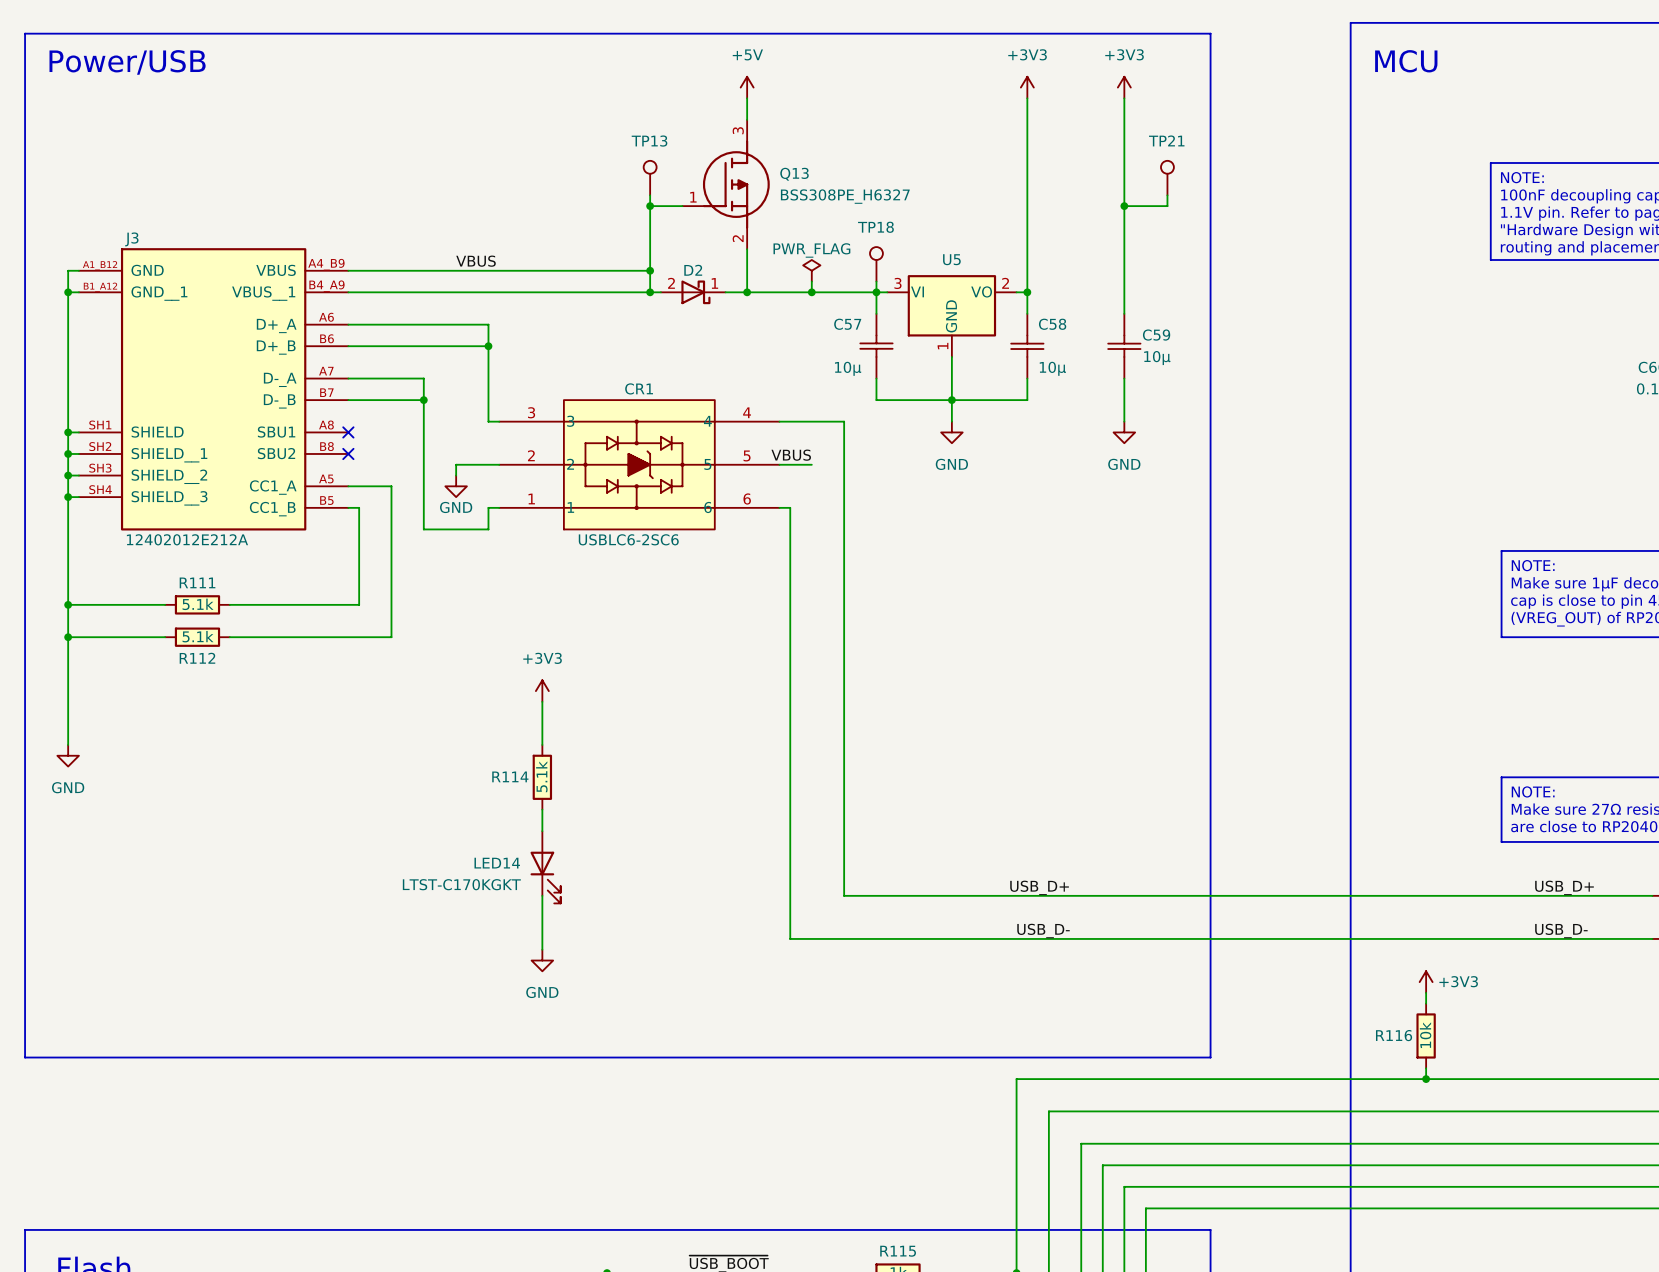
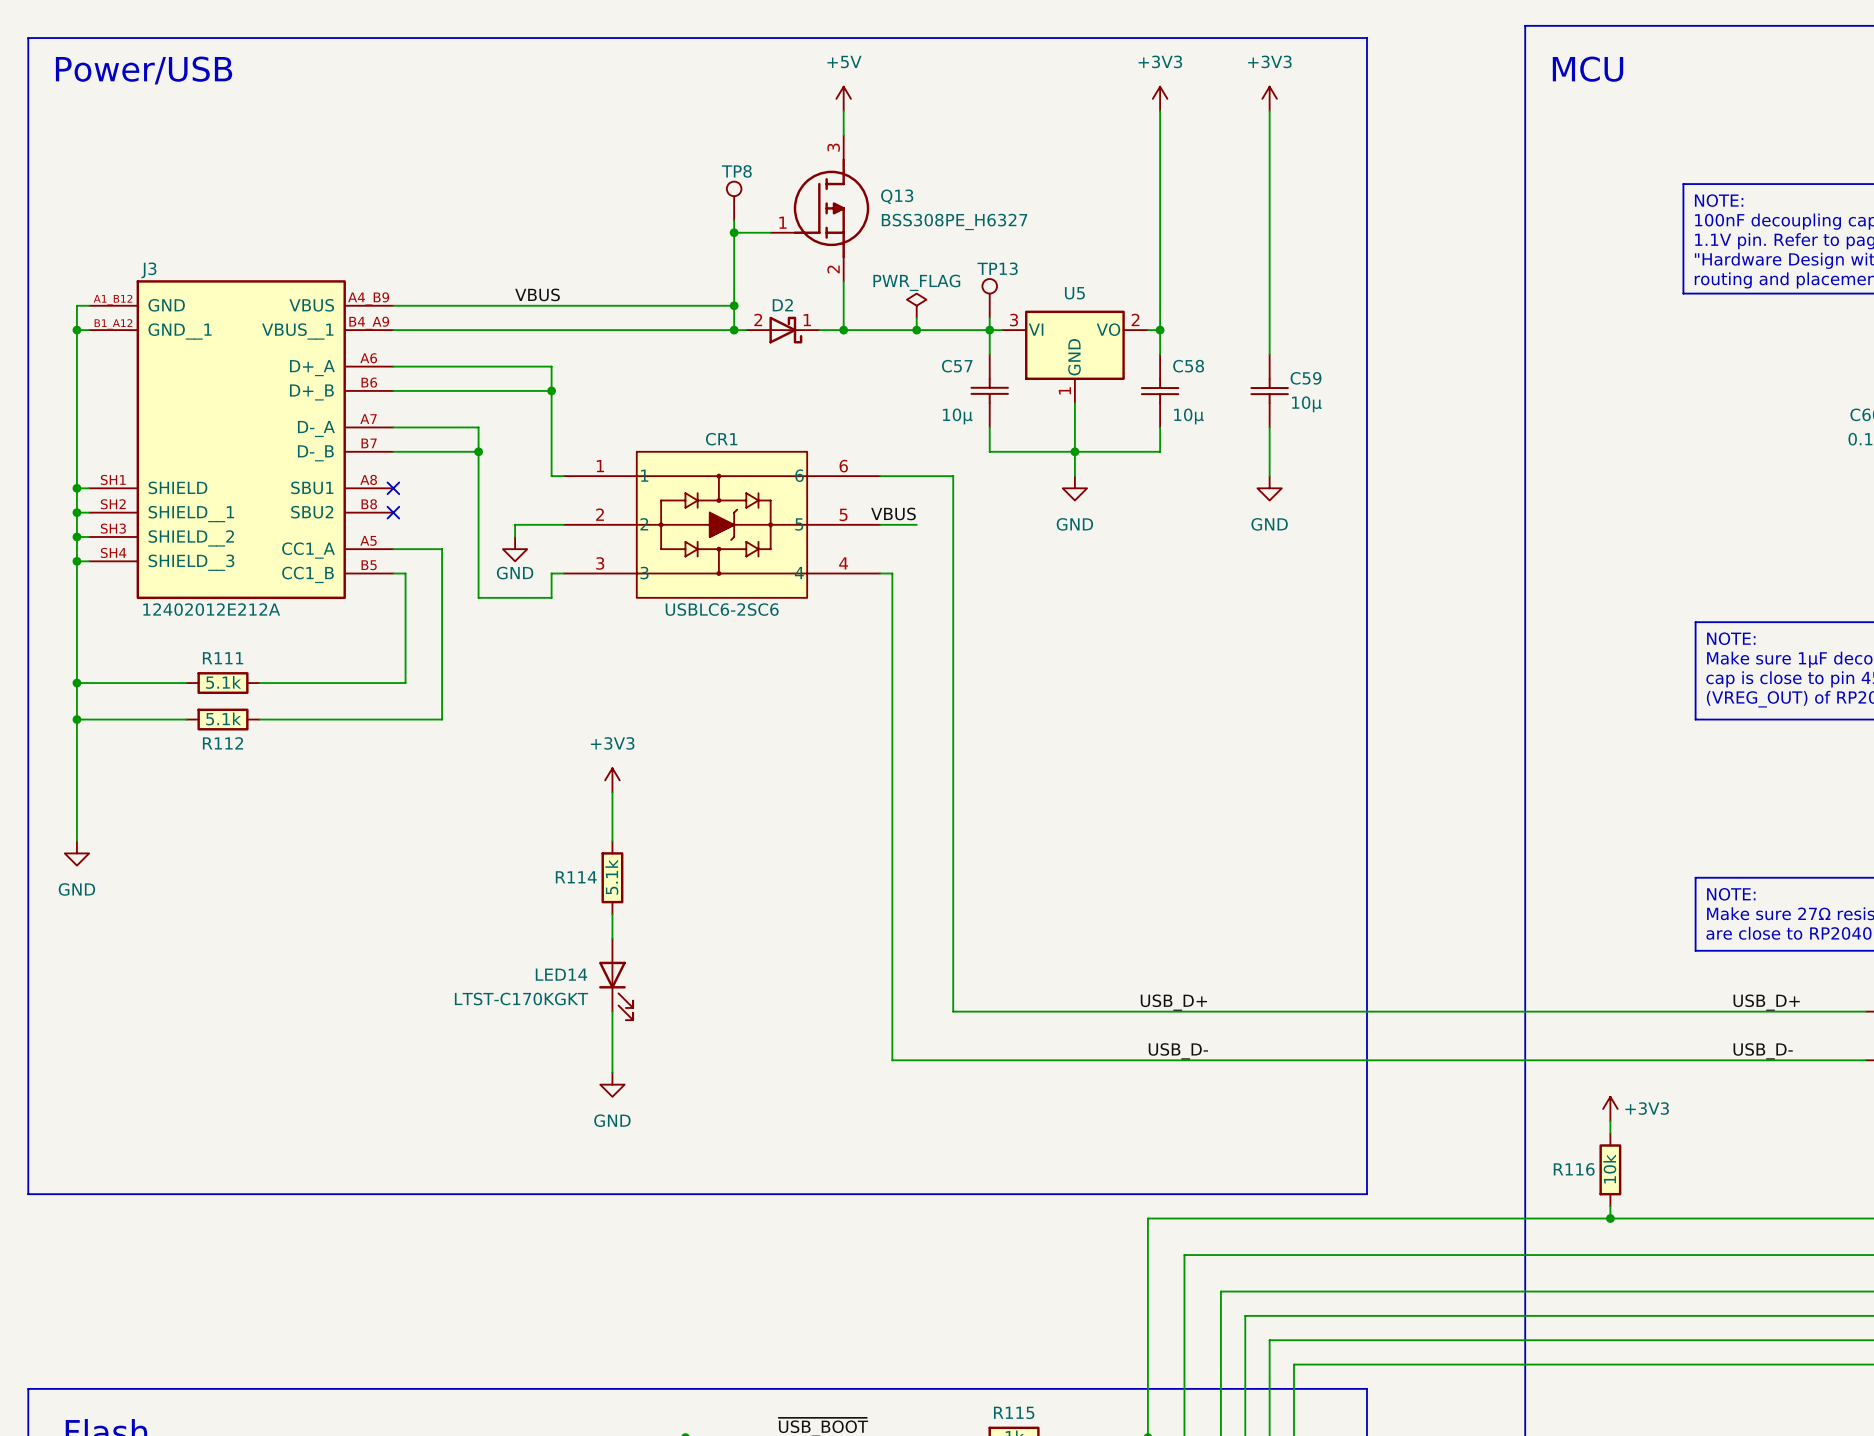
TP13 name: TP13 (649, 141) -> TP8 (736, 171)
TP21: (1167, 178) -> none
wire: (1167, 195) (1167, 206) (1124, 206) -> none
junction: (1124, 206) -> none
TP18 name: TP18 (875, 227) -> TP13 (997, 268)
CR1 flip: as is (639, 464) -> up-down (721, 524)

